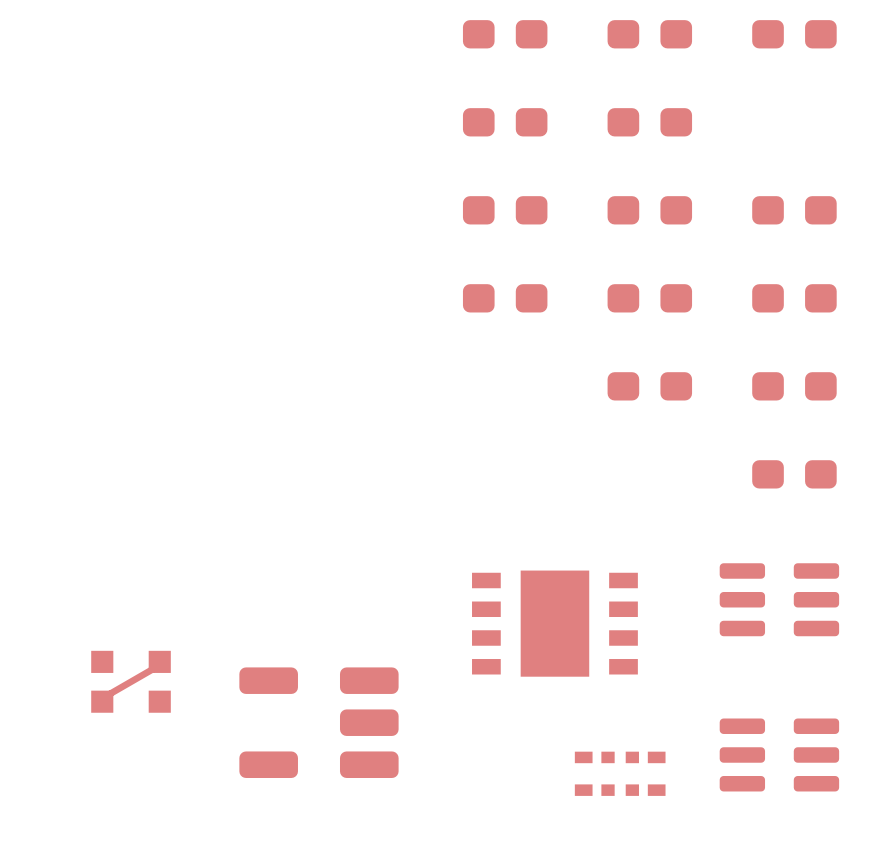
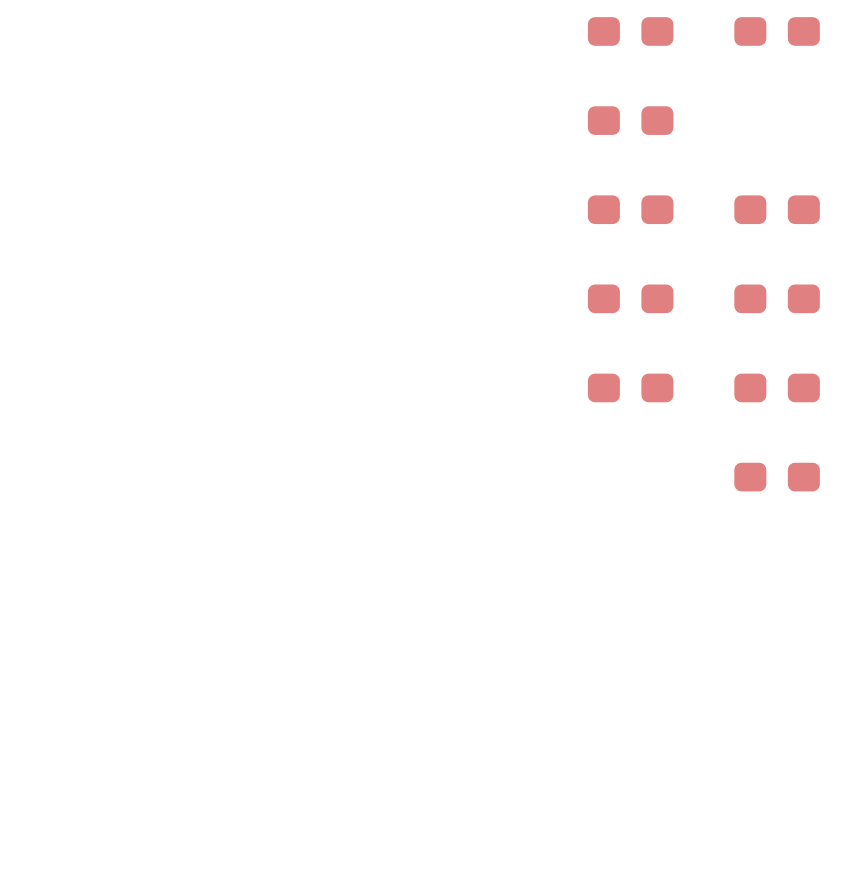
part: (505, 34) -> none
part: (505, 122) -> none
part: (505, 210) -> none
part: (505, 298) -> none
part: (779, 599) -> none
part: (554, 623) -> none
part: (131, 681) -> none
part: (318, 722) -> none
part: (779, 754) -> none
part: (620, 773) -> none

